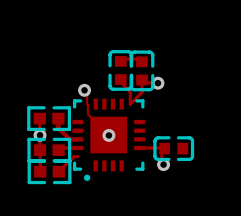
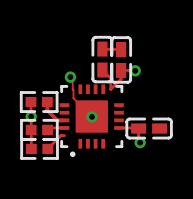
part footprint: [108, 50, 134, 91] -> [91, 35, 114, 84]
part footprint: [129, 50, 155, 92] -> [110, 36, 133, 84]
part footprint: [153, 136, 195, 162] -> [125, 117, 173, 140]

